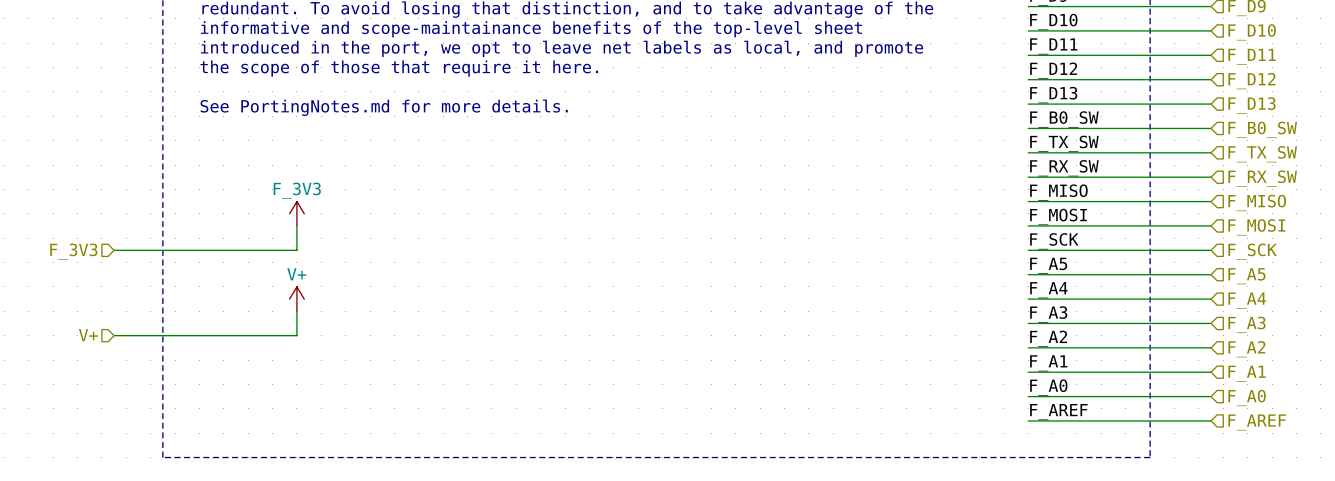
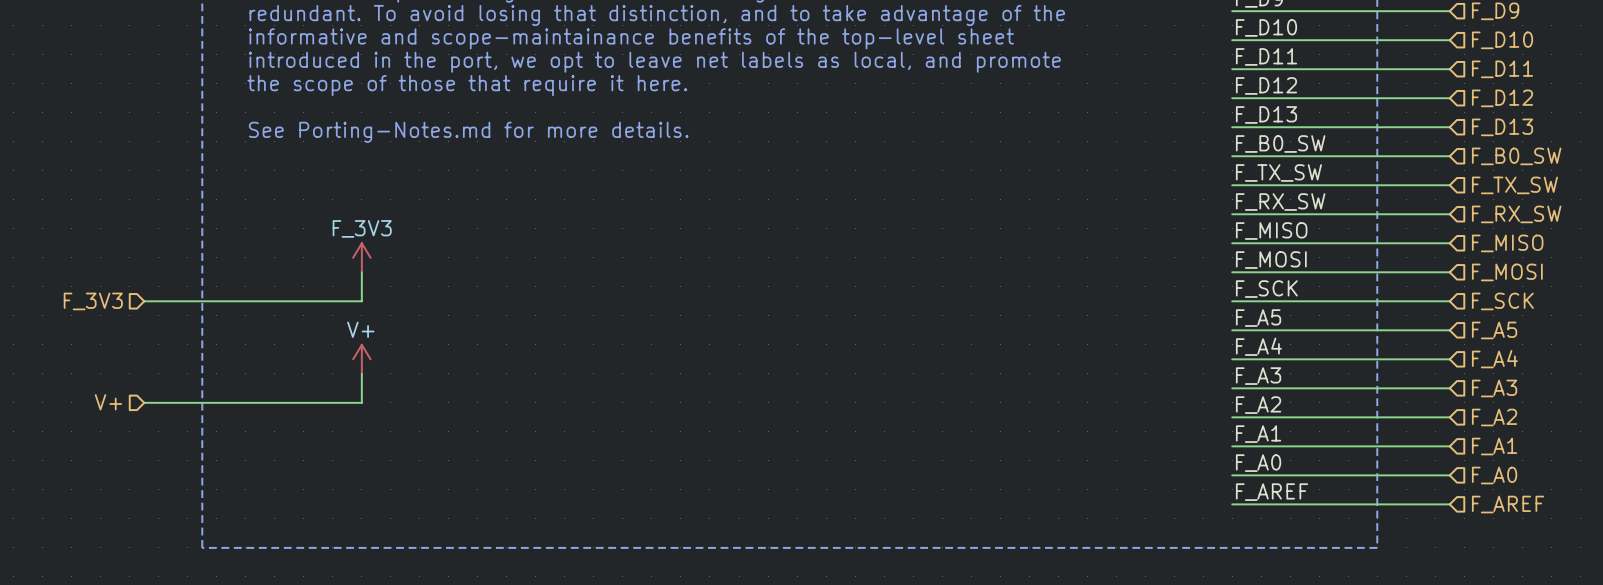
text: See PortingNotes.md for more details. (384, 107) -> See Porting-Notes.md for more details. (468, 132)

